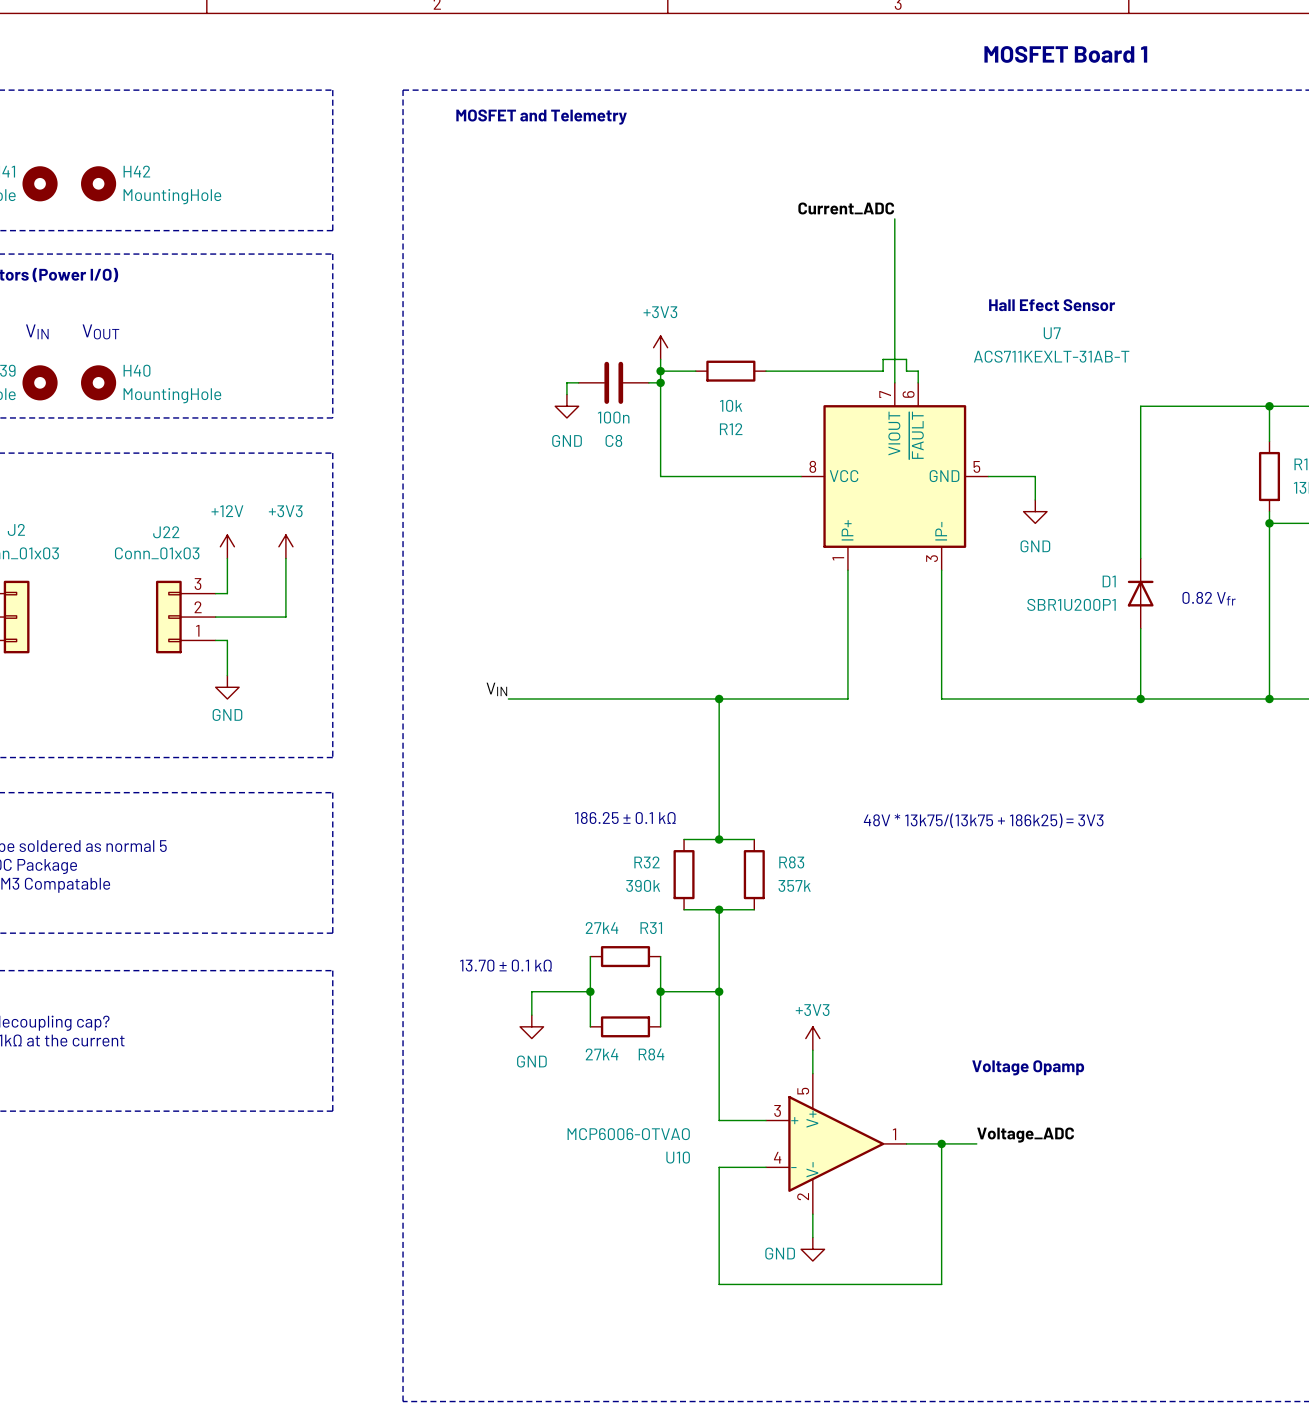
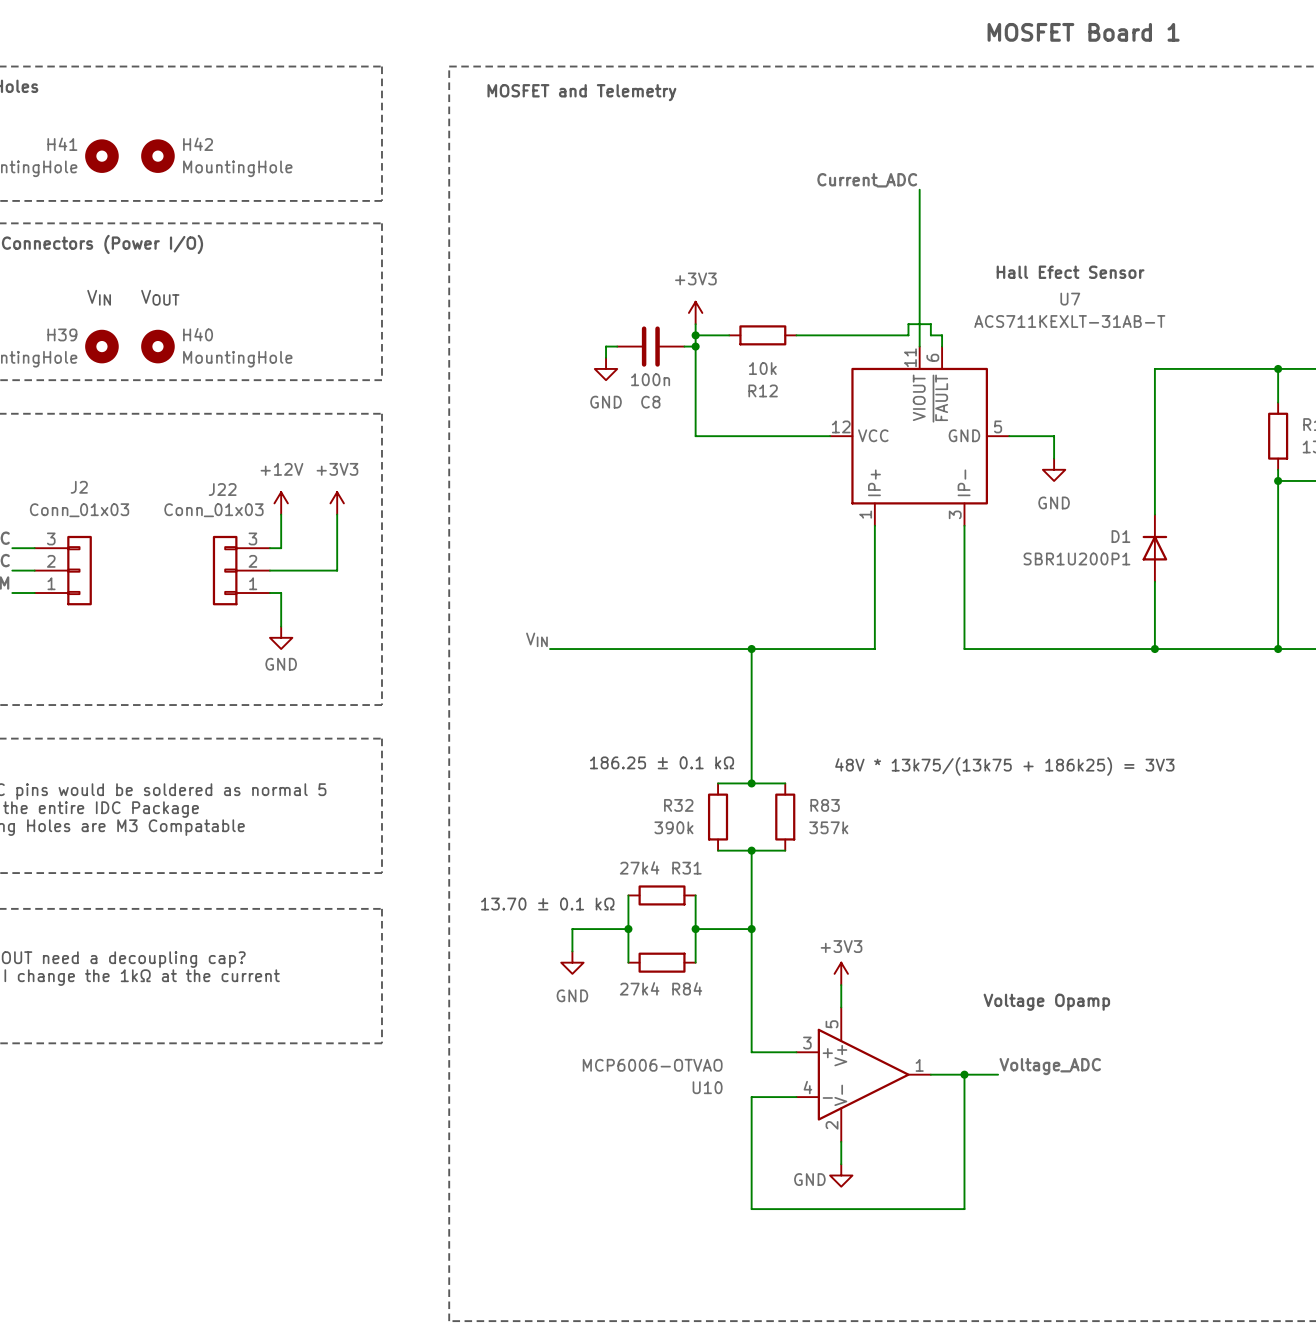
U7 pin number: 7 (885, 394) -> 11 (910, 357)
U7 pin number: 8 (812, 466) -> 12 (841, 426)
text: 0.82 Vfr (1209, 598) -> none

